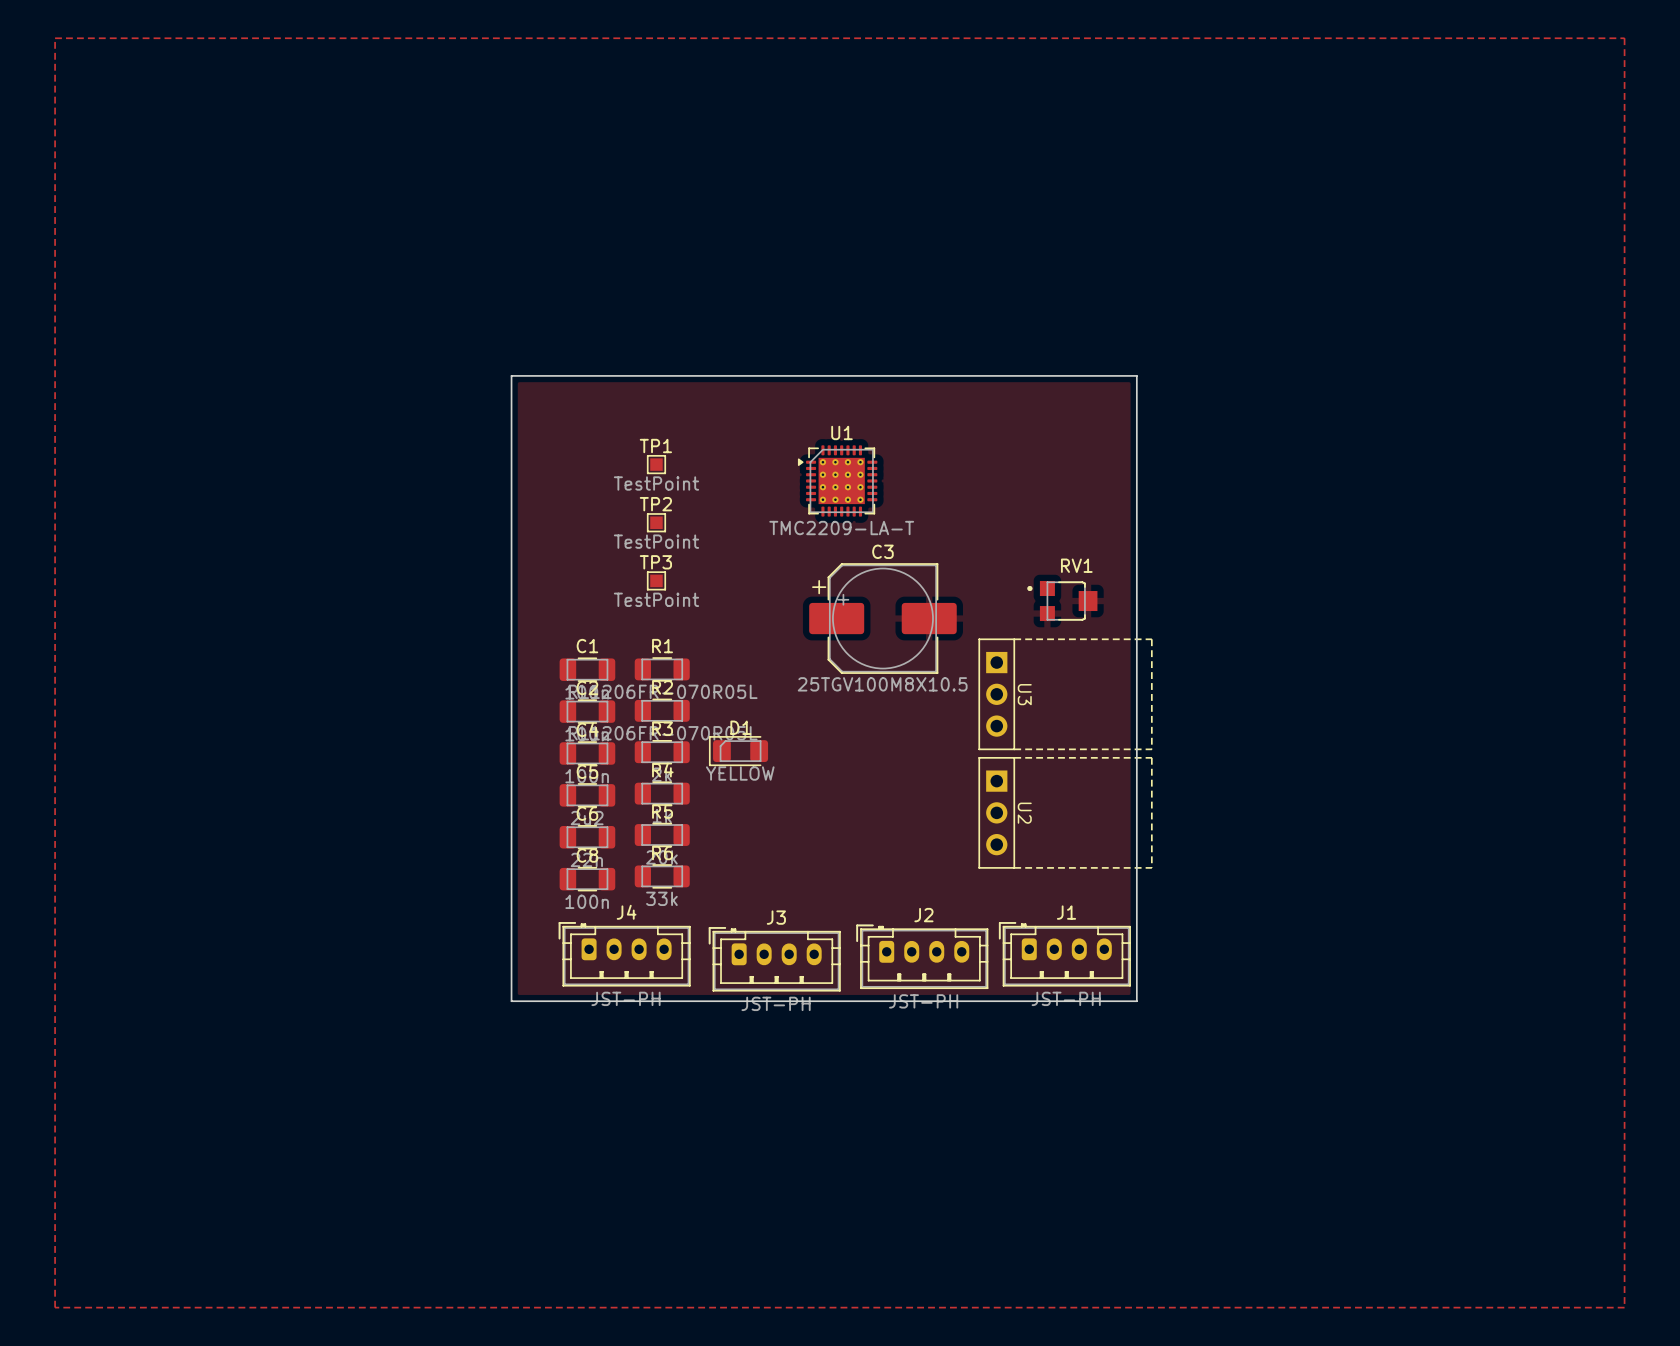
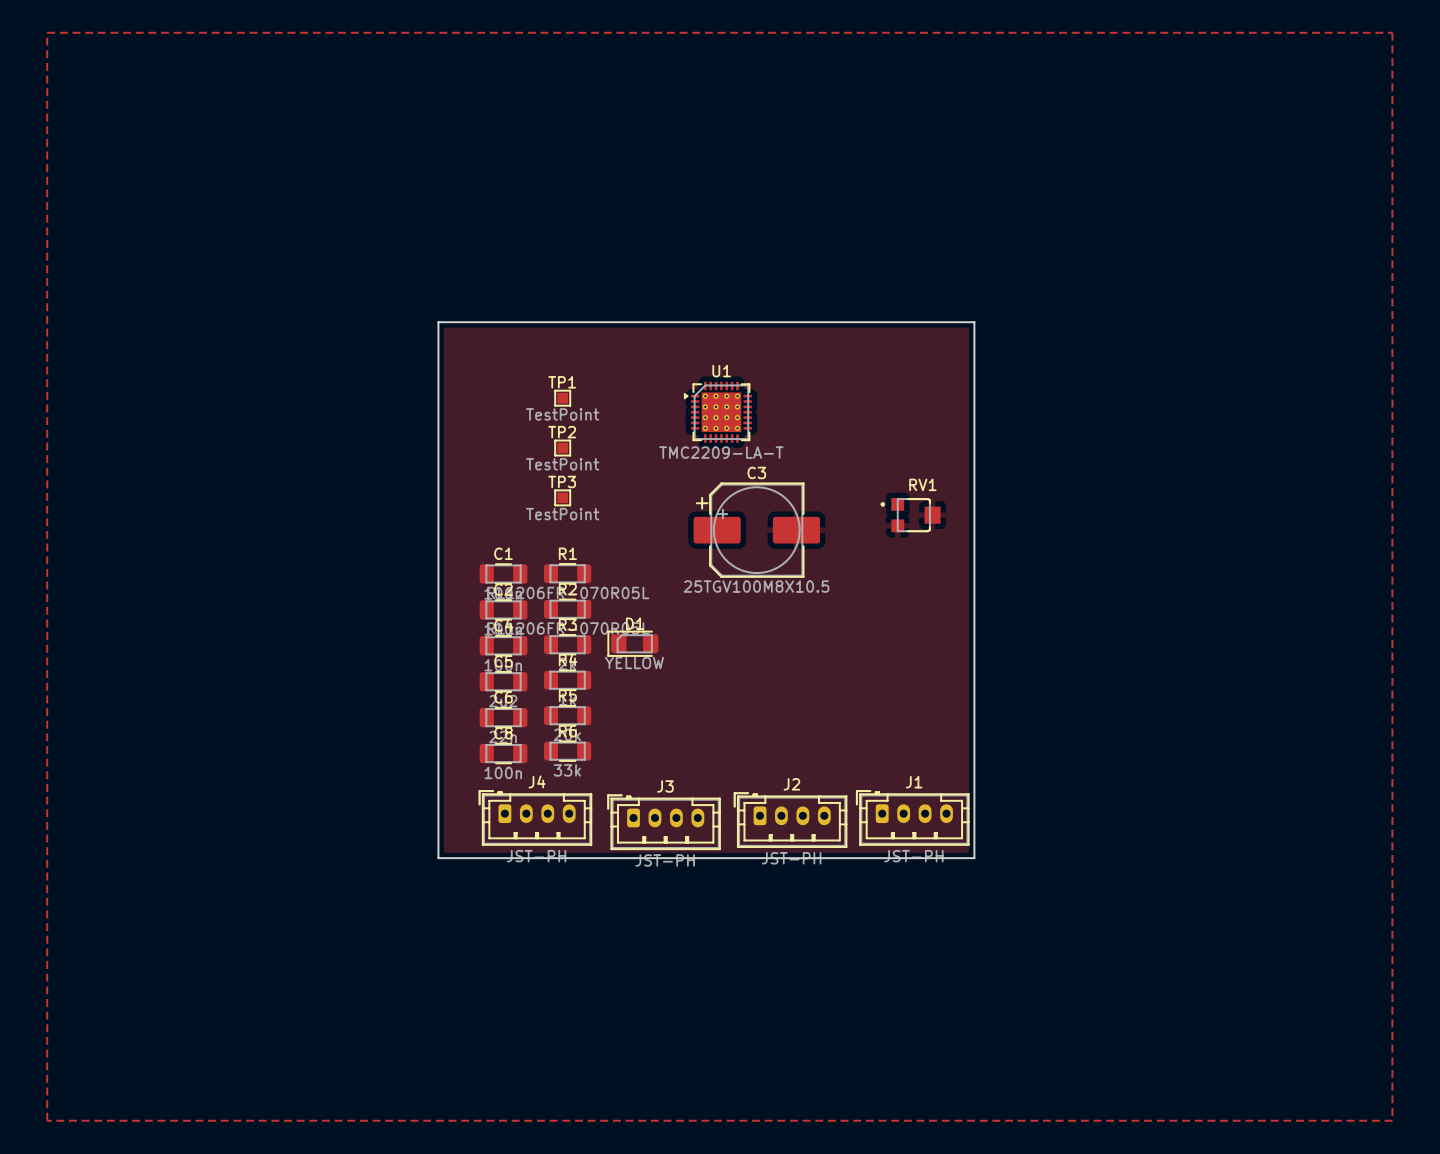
U3: (1065, 694) -> none
U2: (1065, 812) -> none

